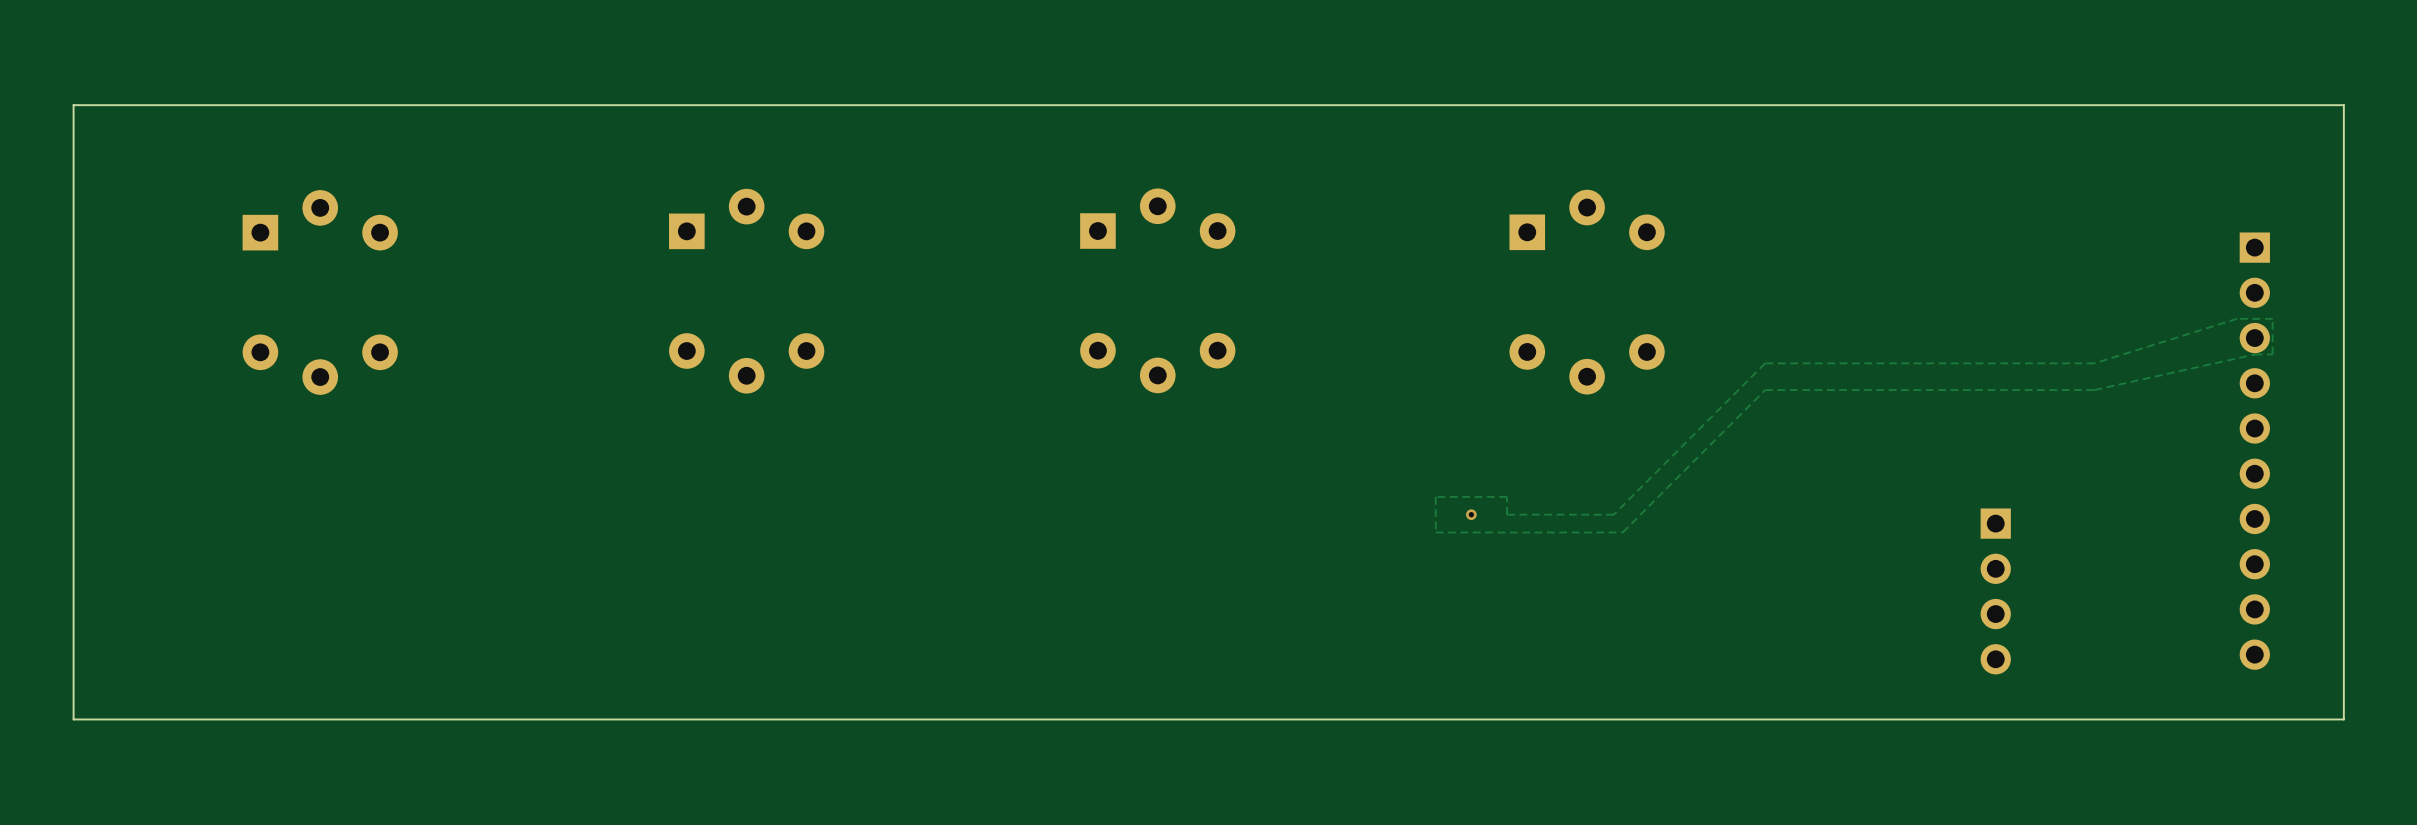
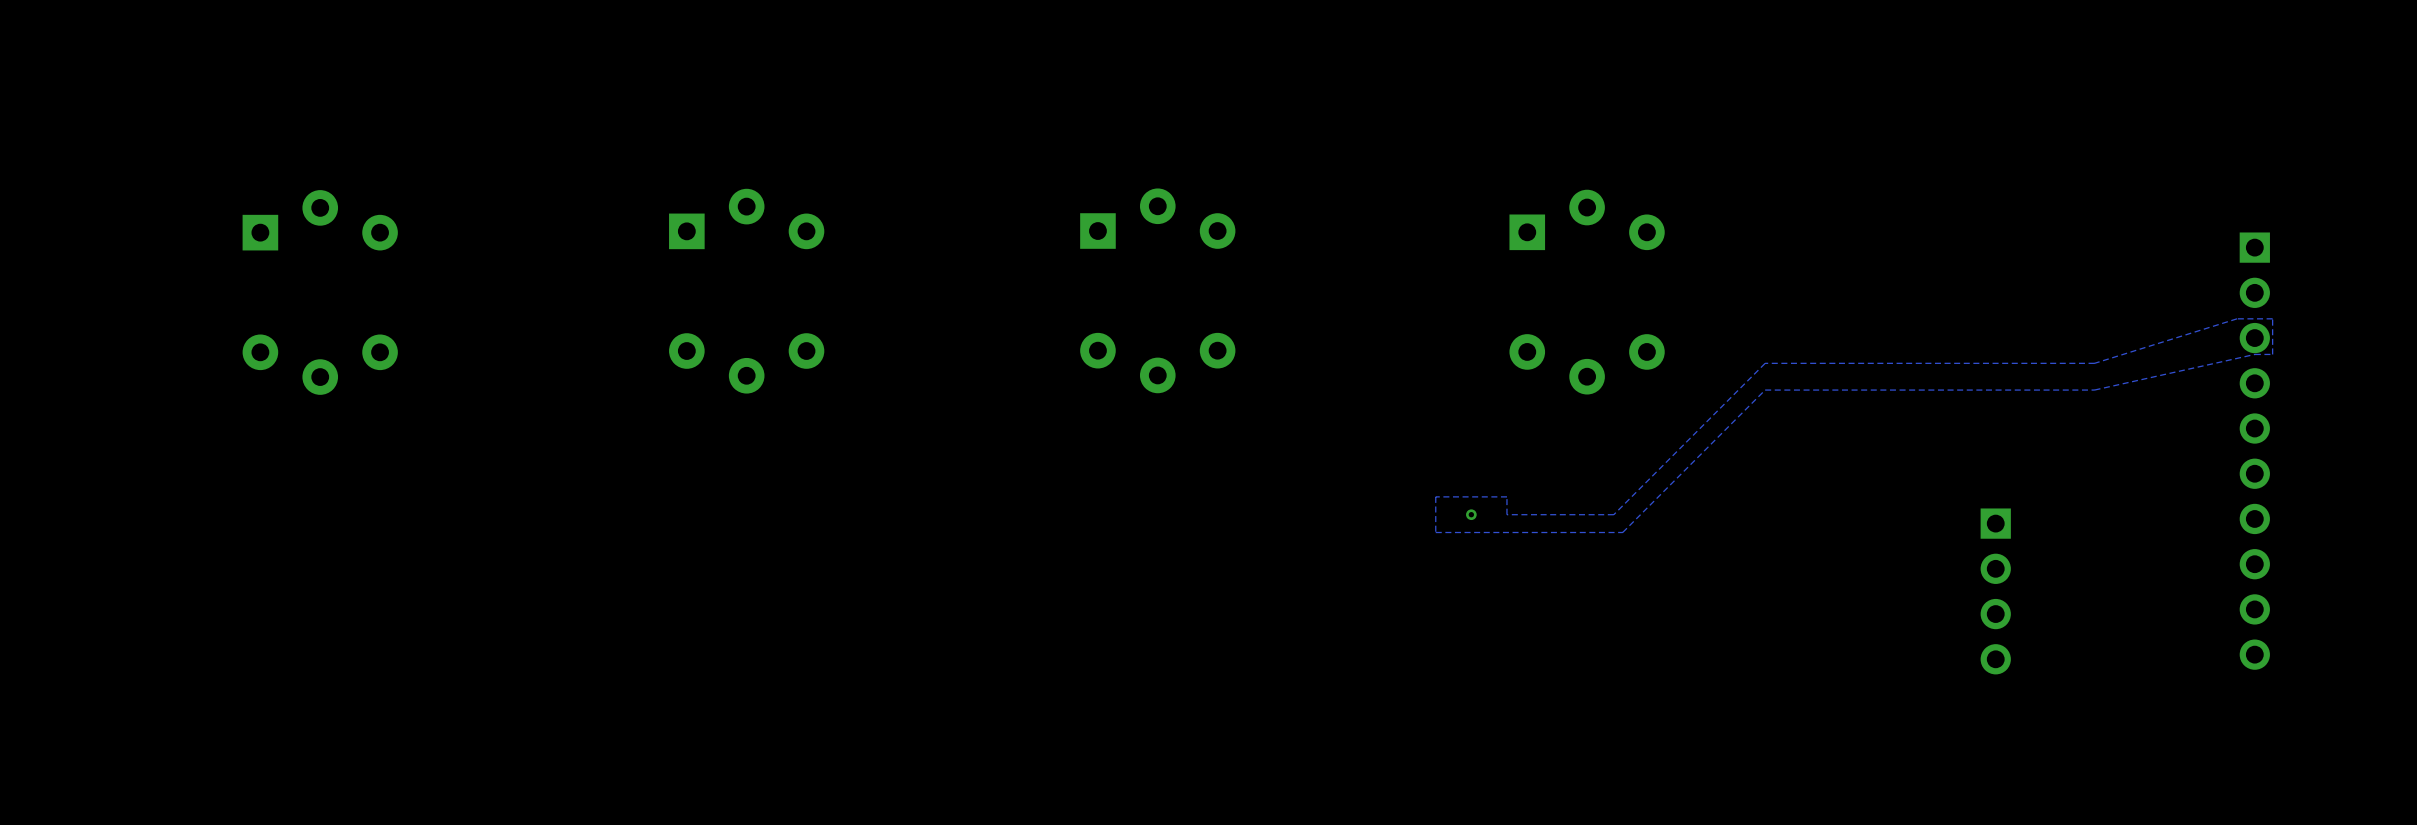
board edge: (2343, 105) (73, 105) (73, 719) (2343, 719) (2343, 105) -> none

